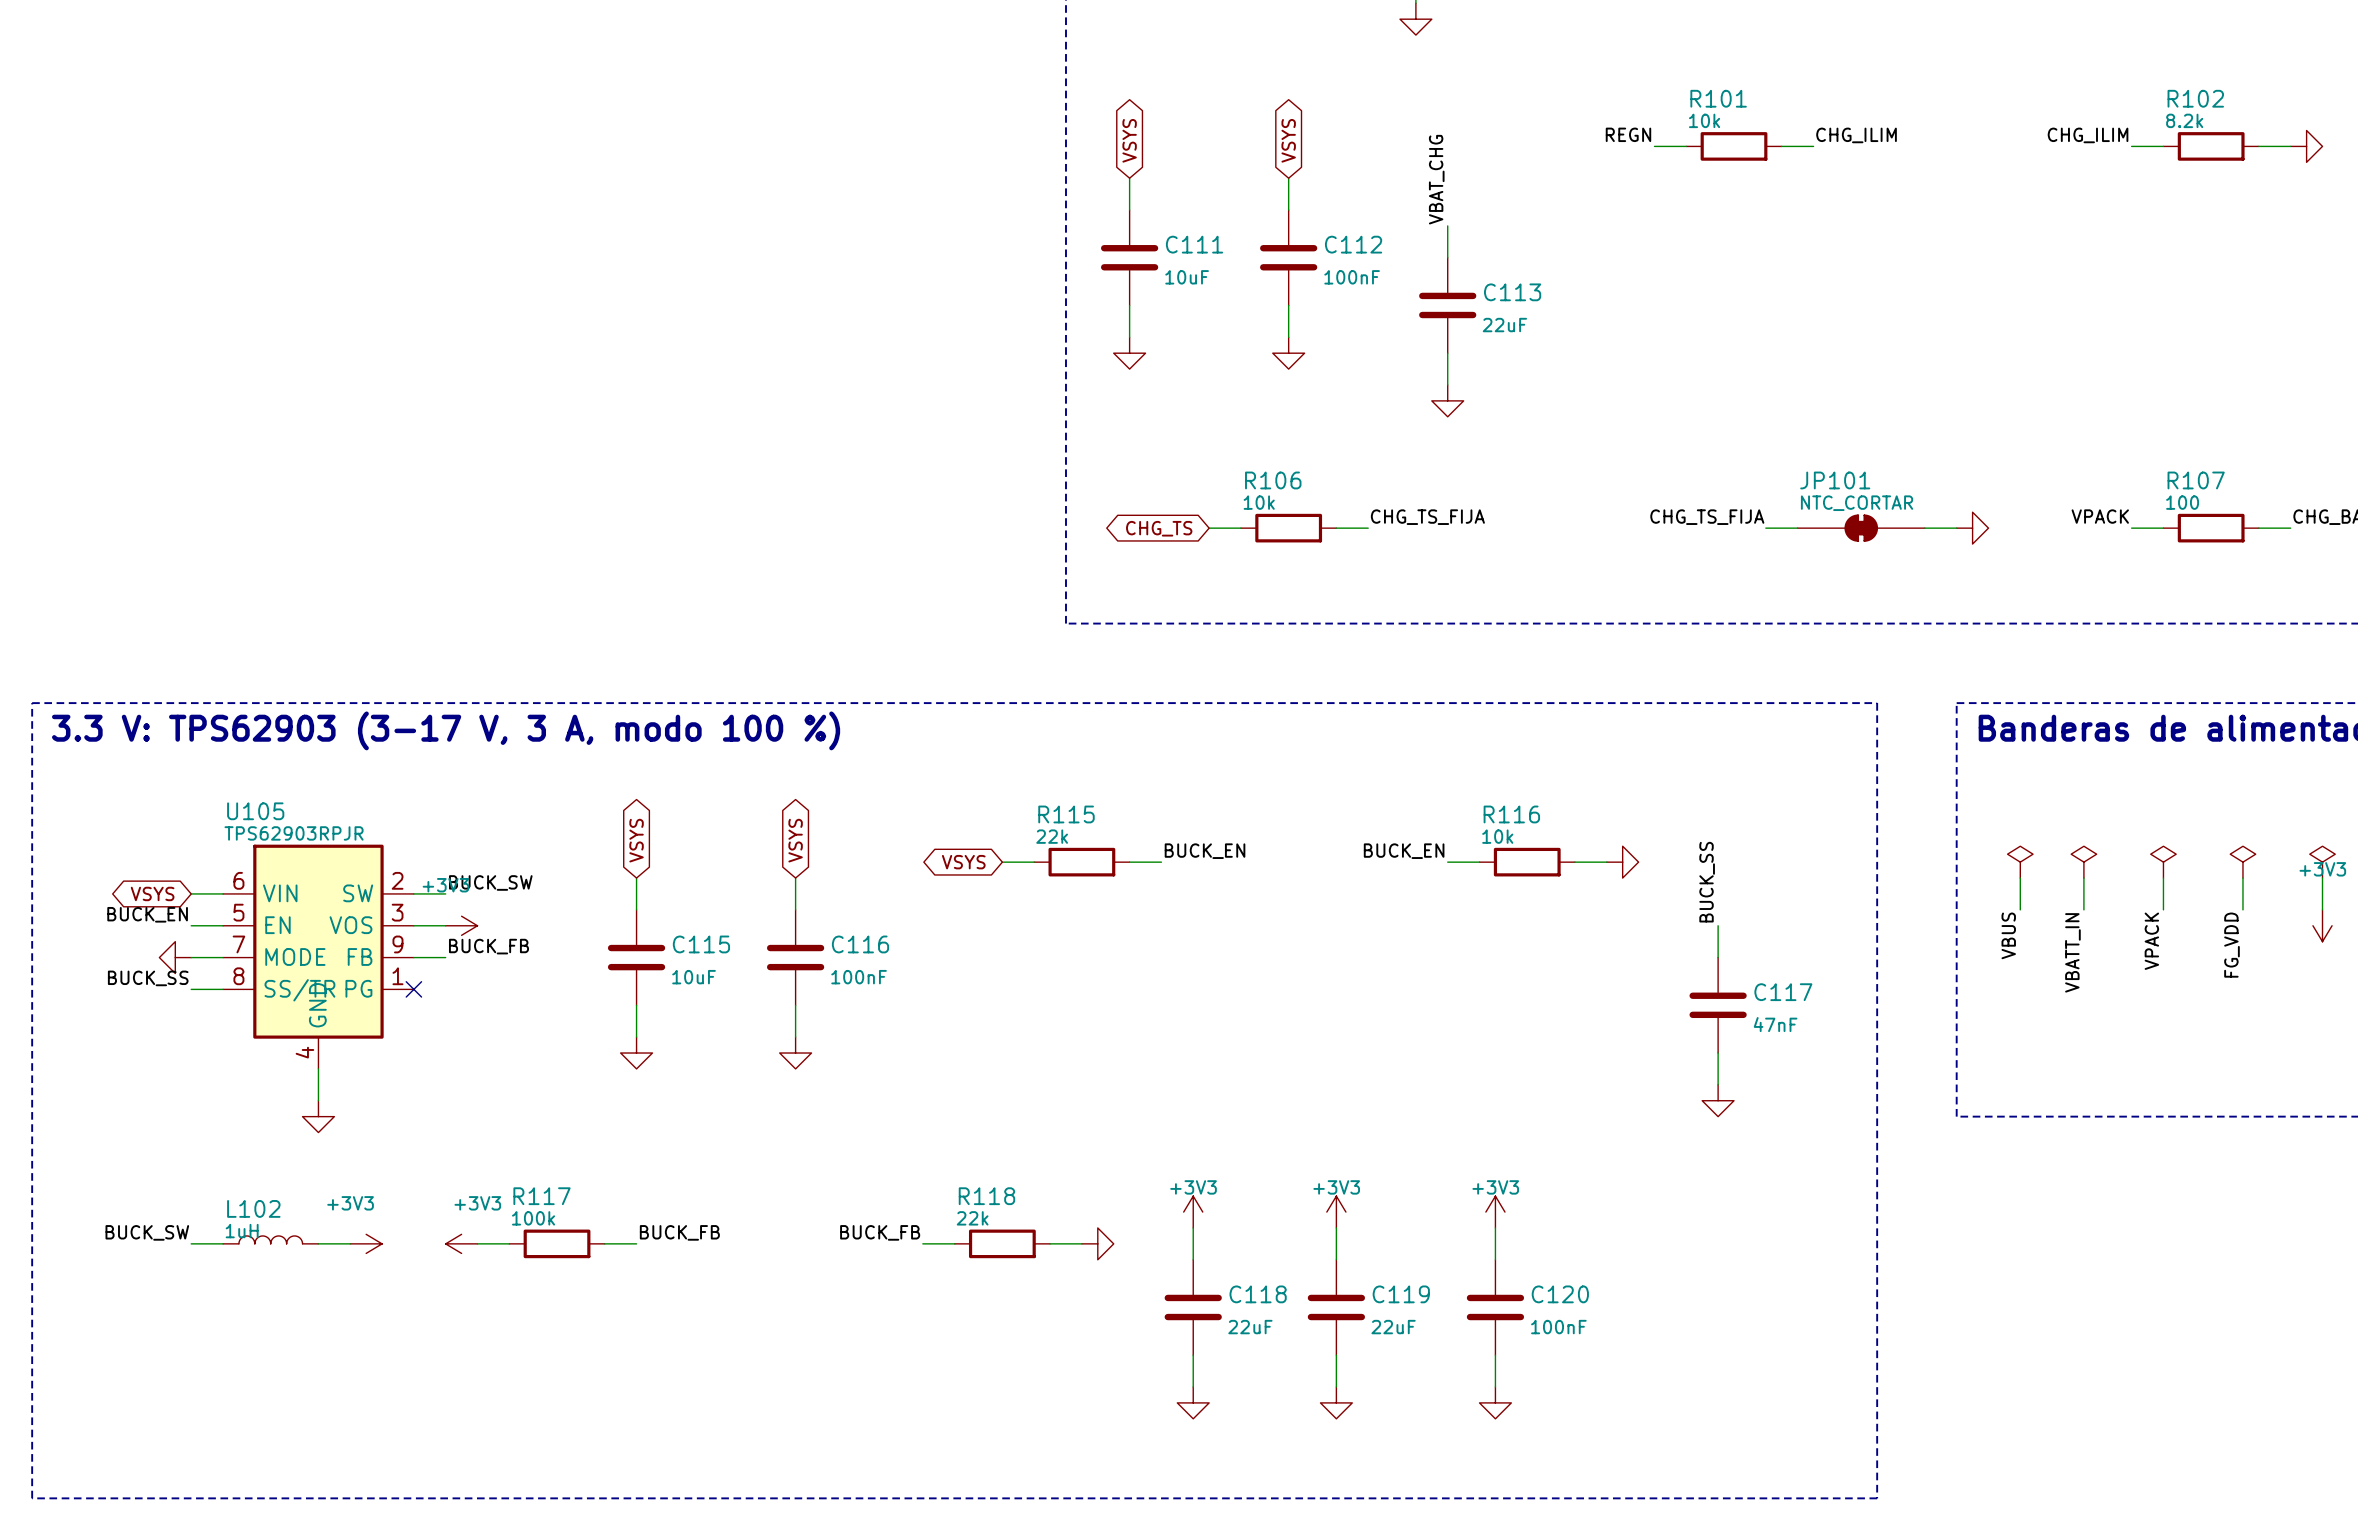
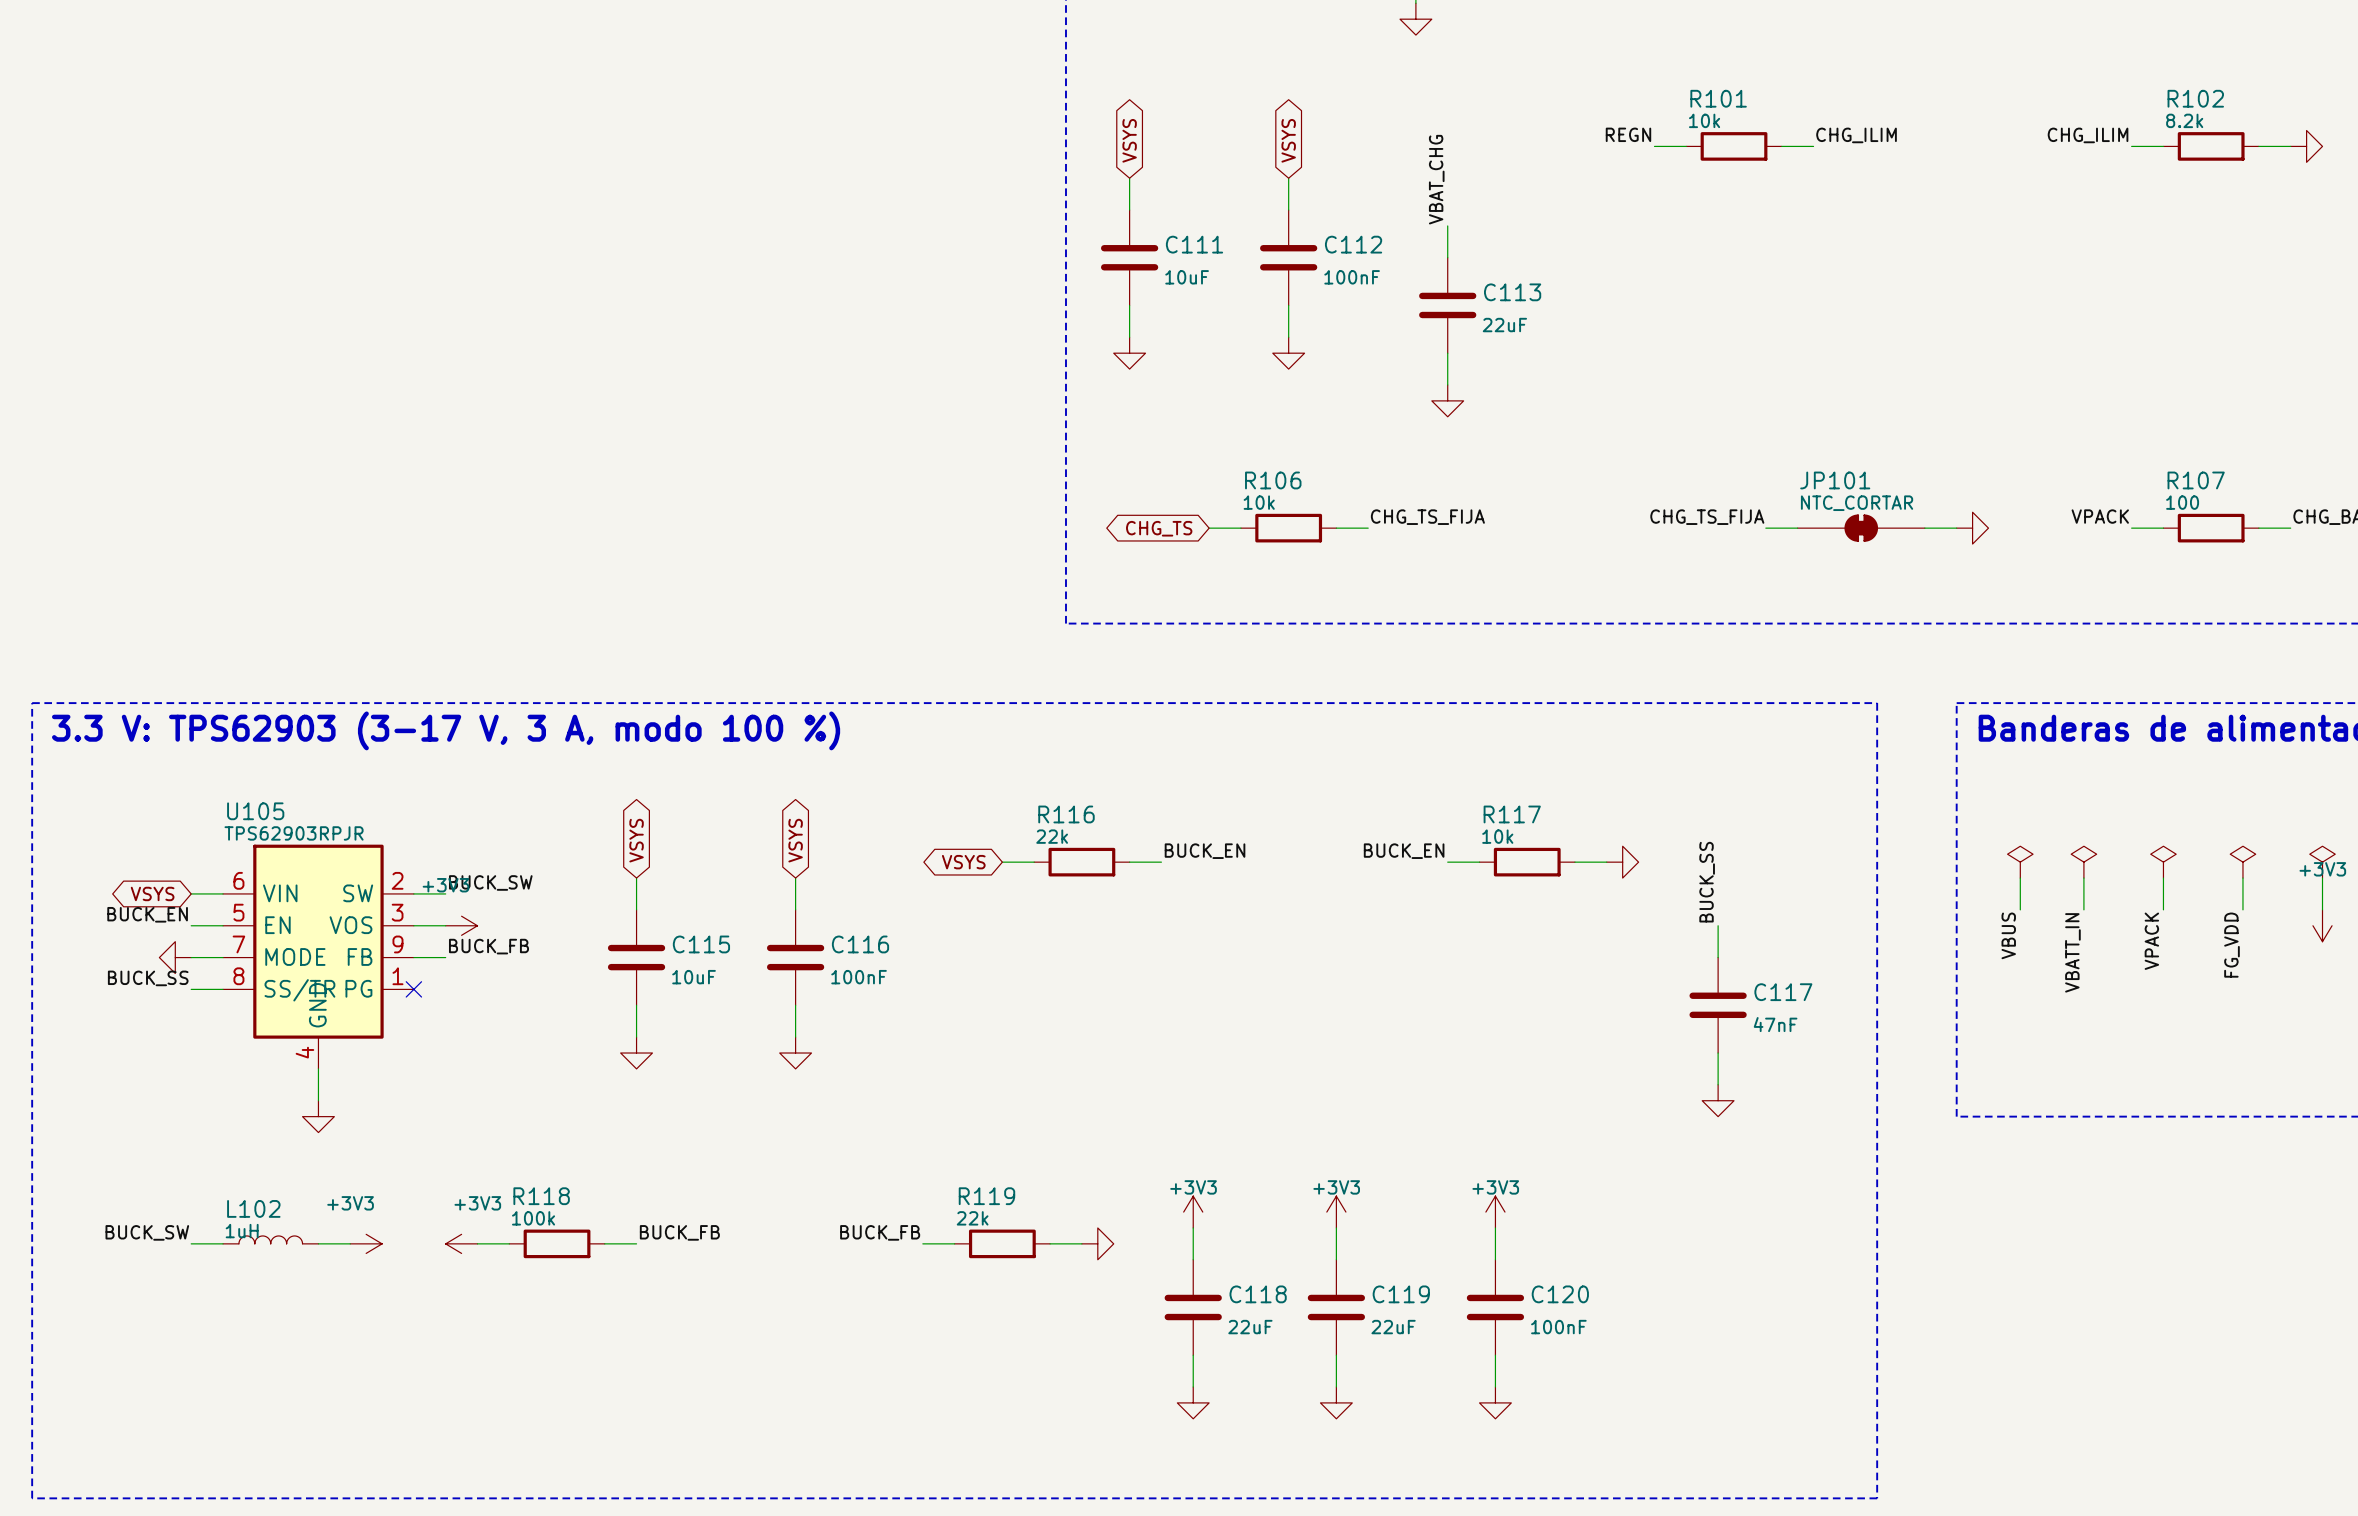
R115 name: R115 (1066, 814) -> R116 (1066, 814)
R116 name: R116 (1511, 814) -> R117 (1512, 814)
R117 name: R117 (542, 1196) -> R118 (541, 1196)
R118 name: R118 (986, 1196) -> R119 (986, 1196)

